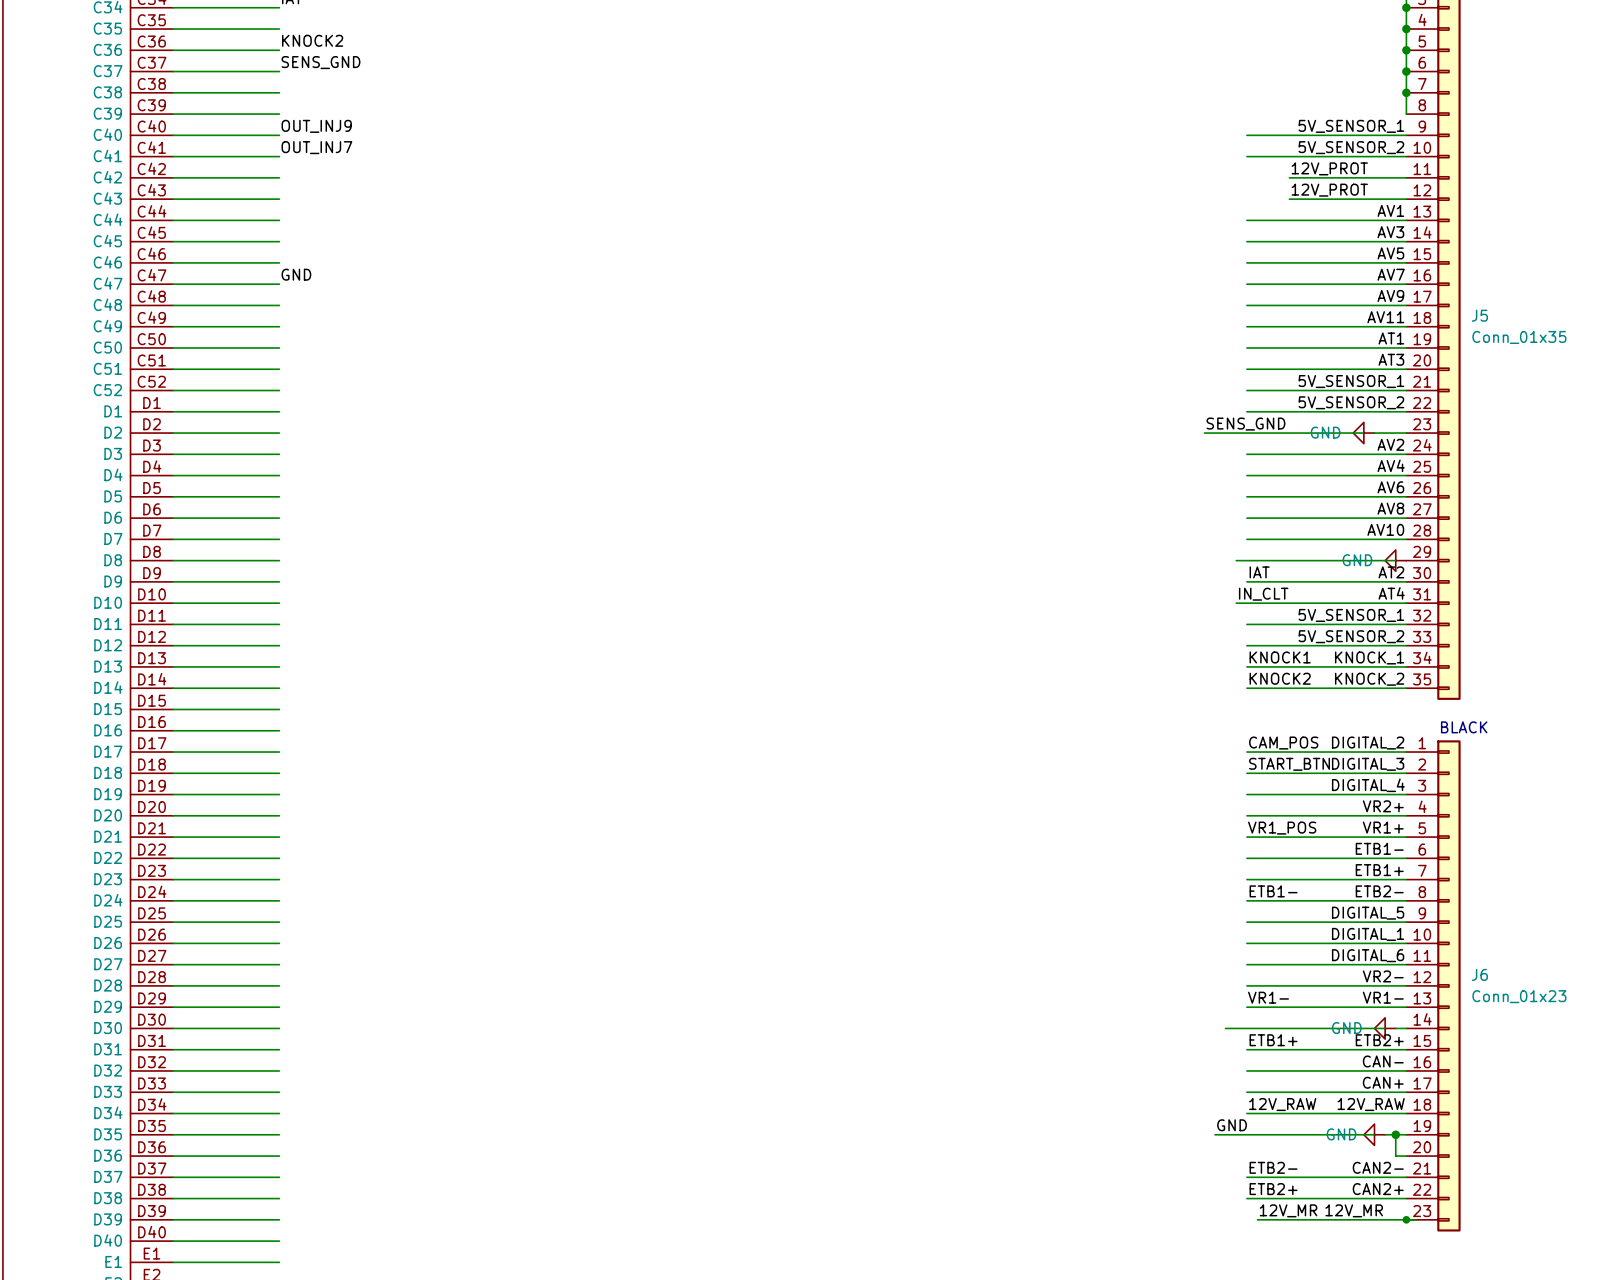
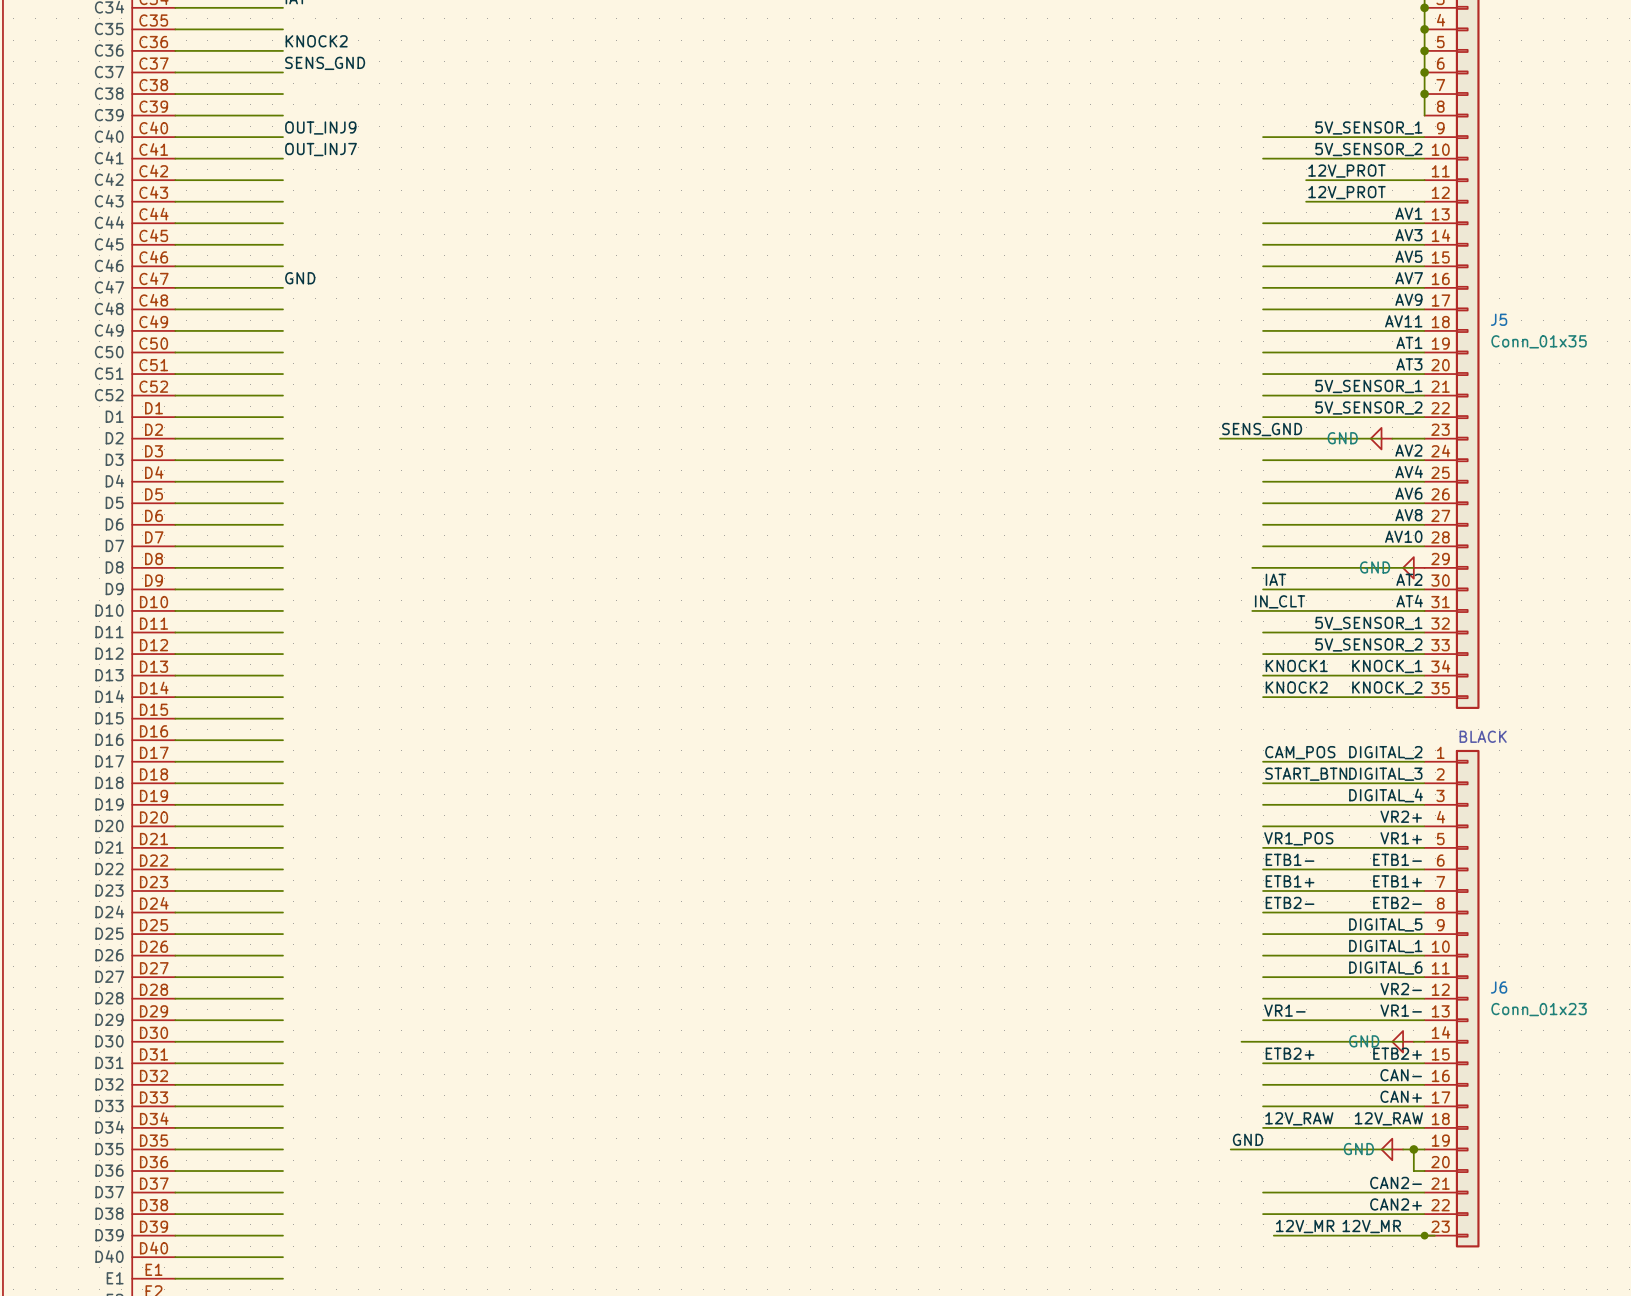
label: none -> ETB1- (1290, 859)
label: none -> ETB1+ (1290, 881)
label: ETB1- (1273, 891) -> ETB2- (1290, 902)
label: ETB1+ (1273, 1040) -> ETB2+ (1290, 1053)
label: ETB2- (1273, 1167) -> none
label: ETB2+ (1273, 1189) -> none

